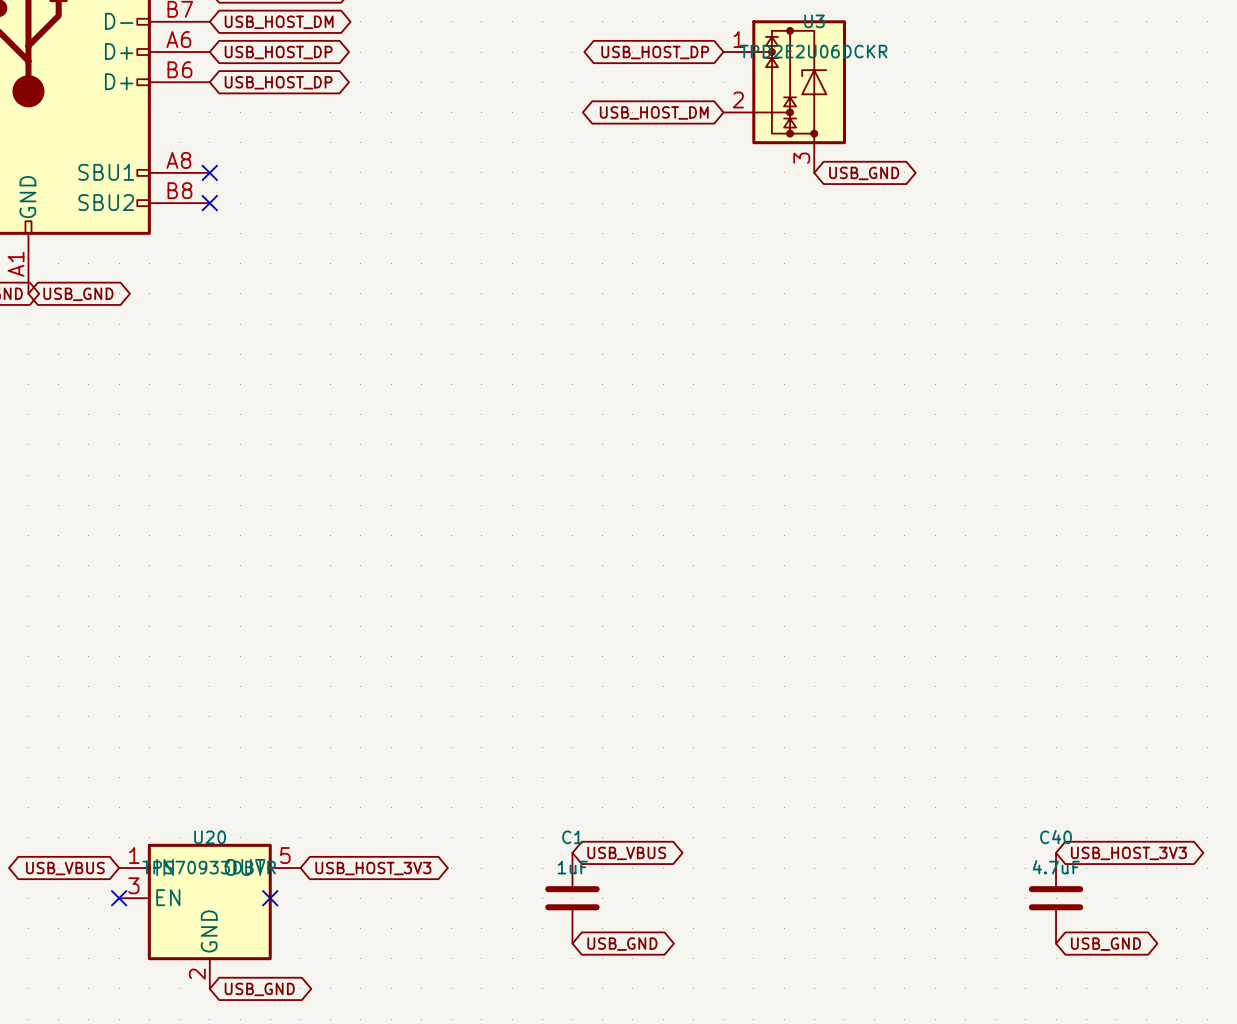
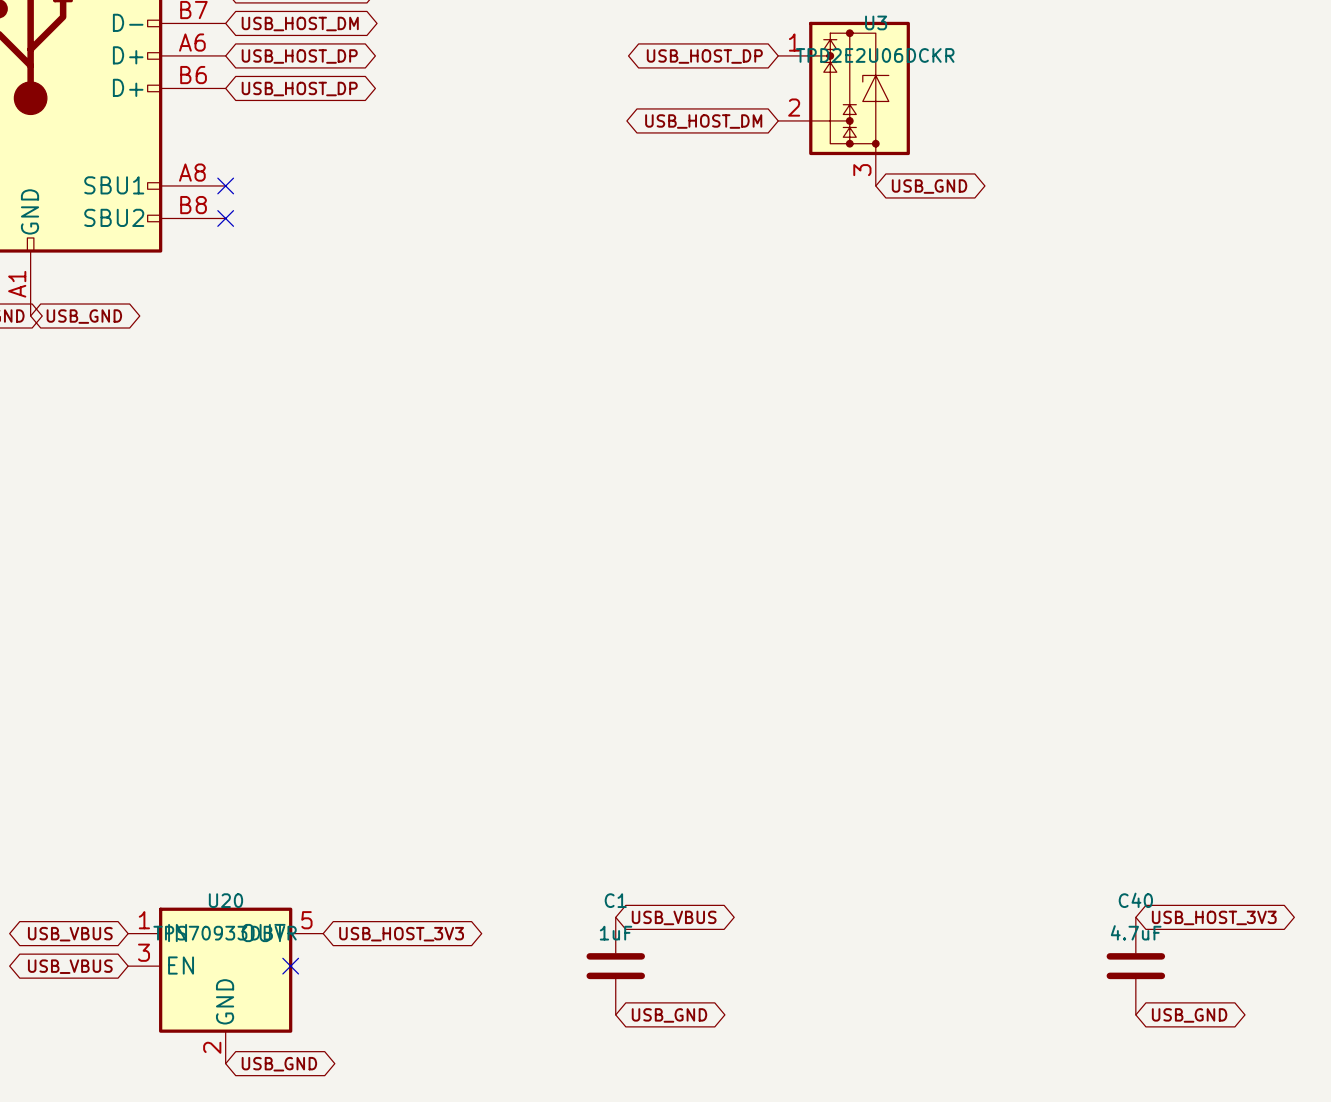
global label: none -> USB_VBUS (70, 966)
no-connect mark: (119, 898) -> none

